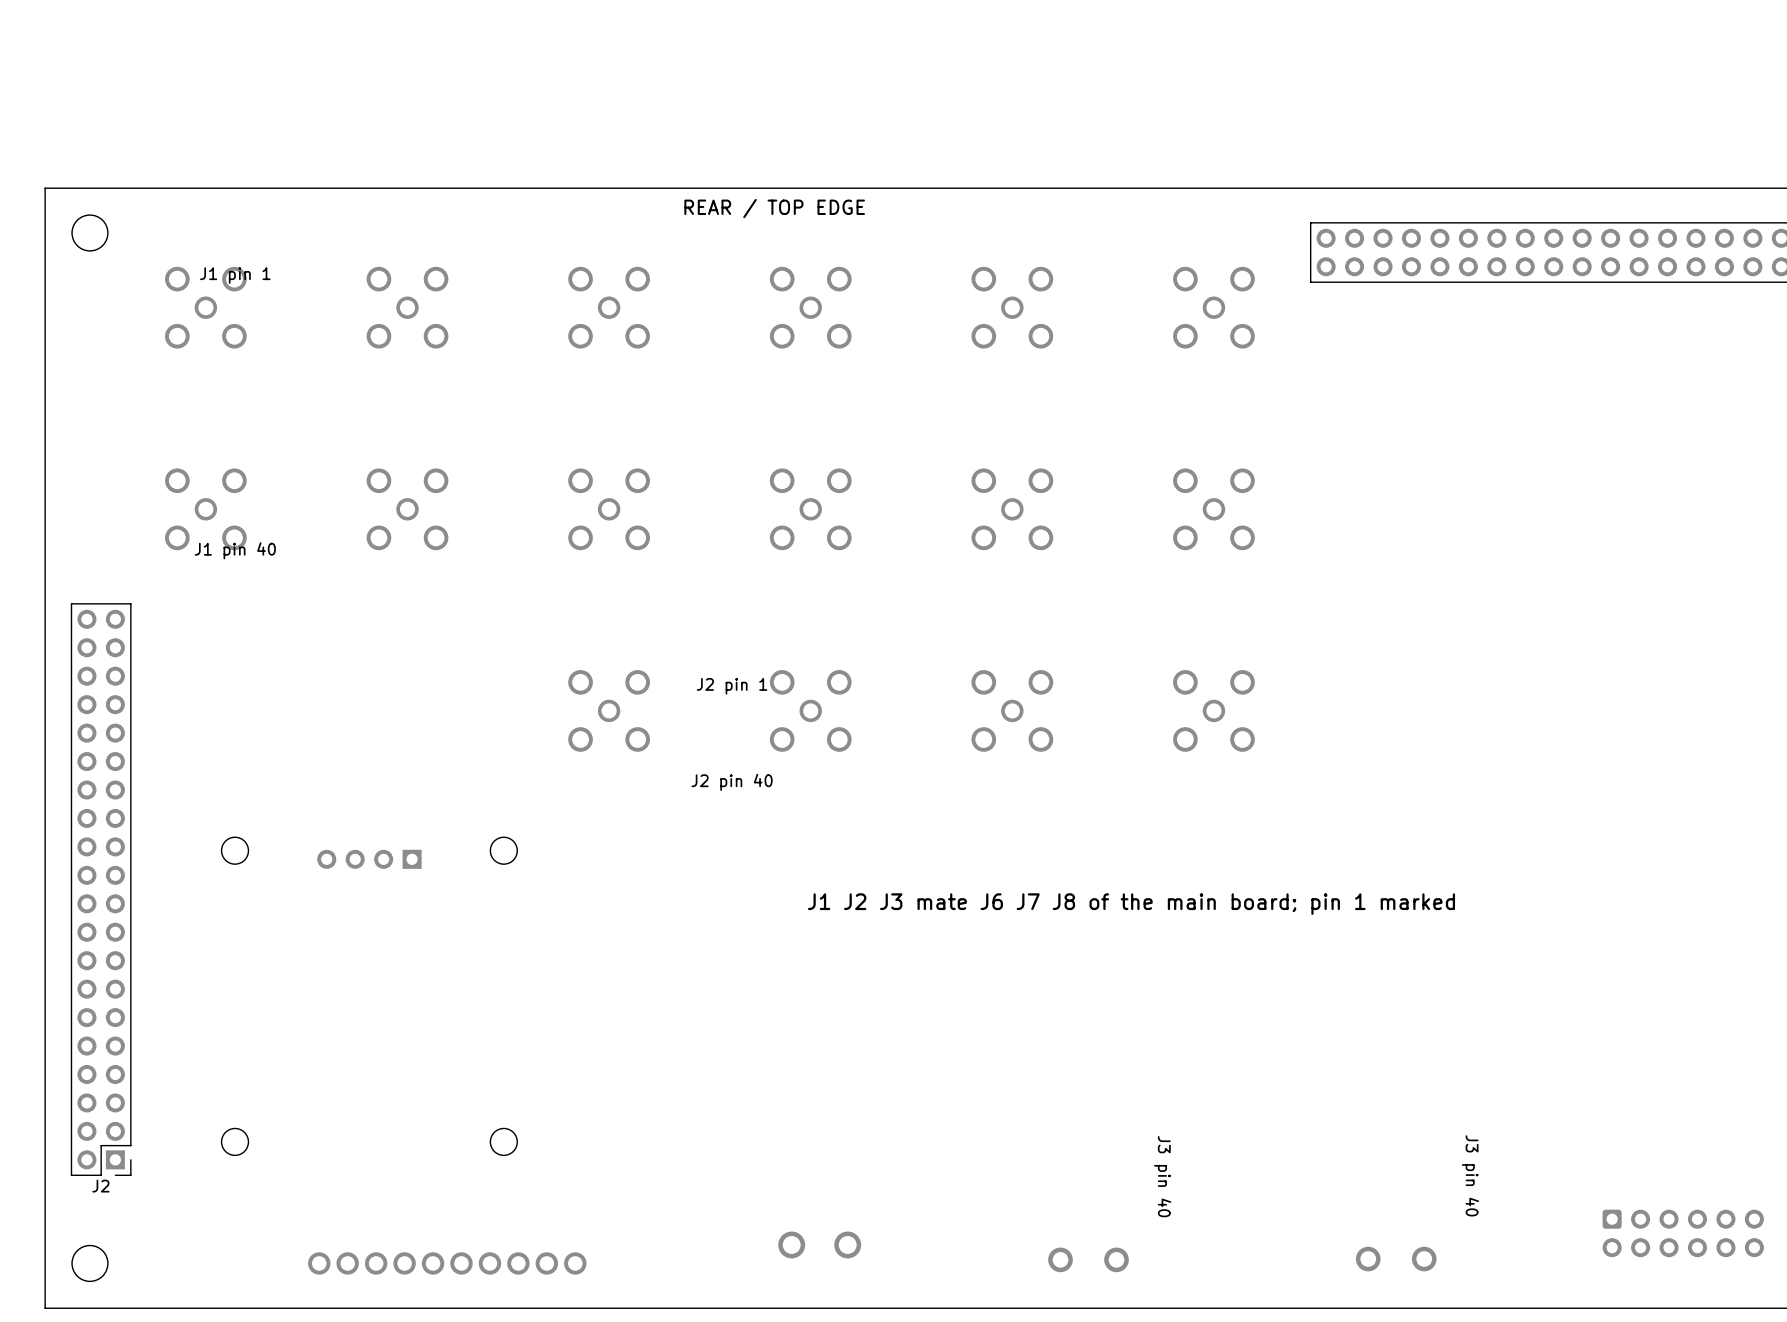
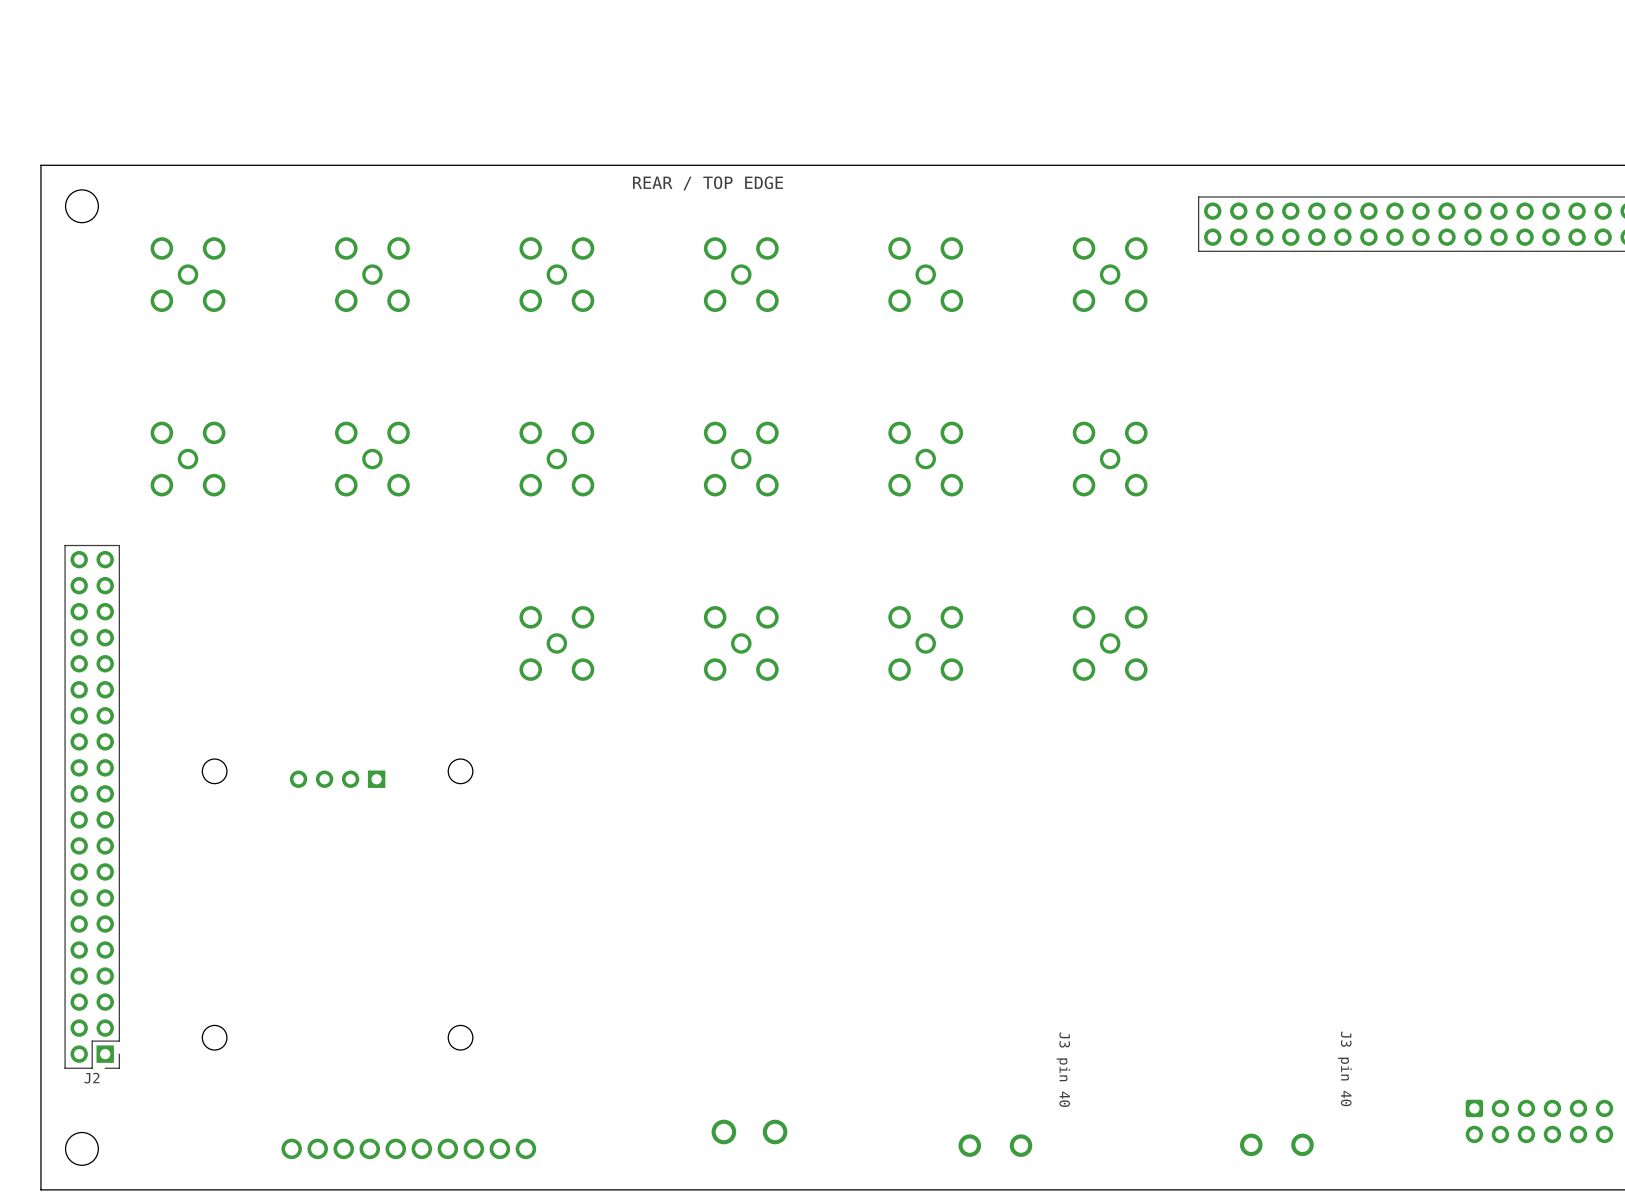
text: J1 pin 1 (235, 275) -> none
text: J1 pin 40 (235, 550) -> none
text: J2 pin 1 (732, 686) -> none
text: J2 pin 40 (732, 782) -> none
text: J1 J2 J3 mate J6 J7 J8 of the main board; pin 1 marked (1131, 904) -> none

